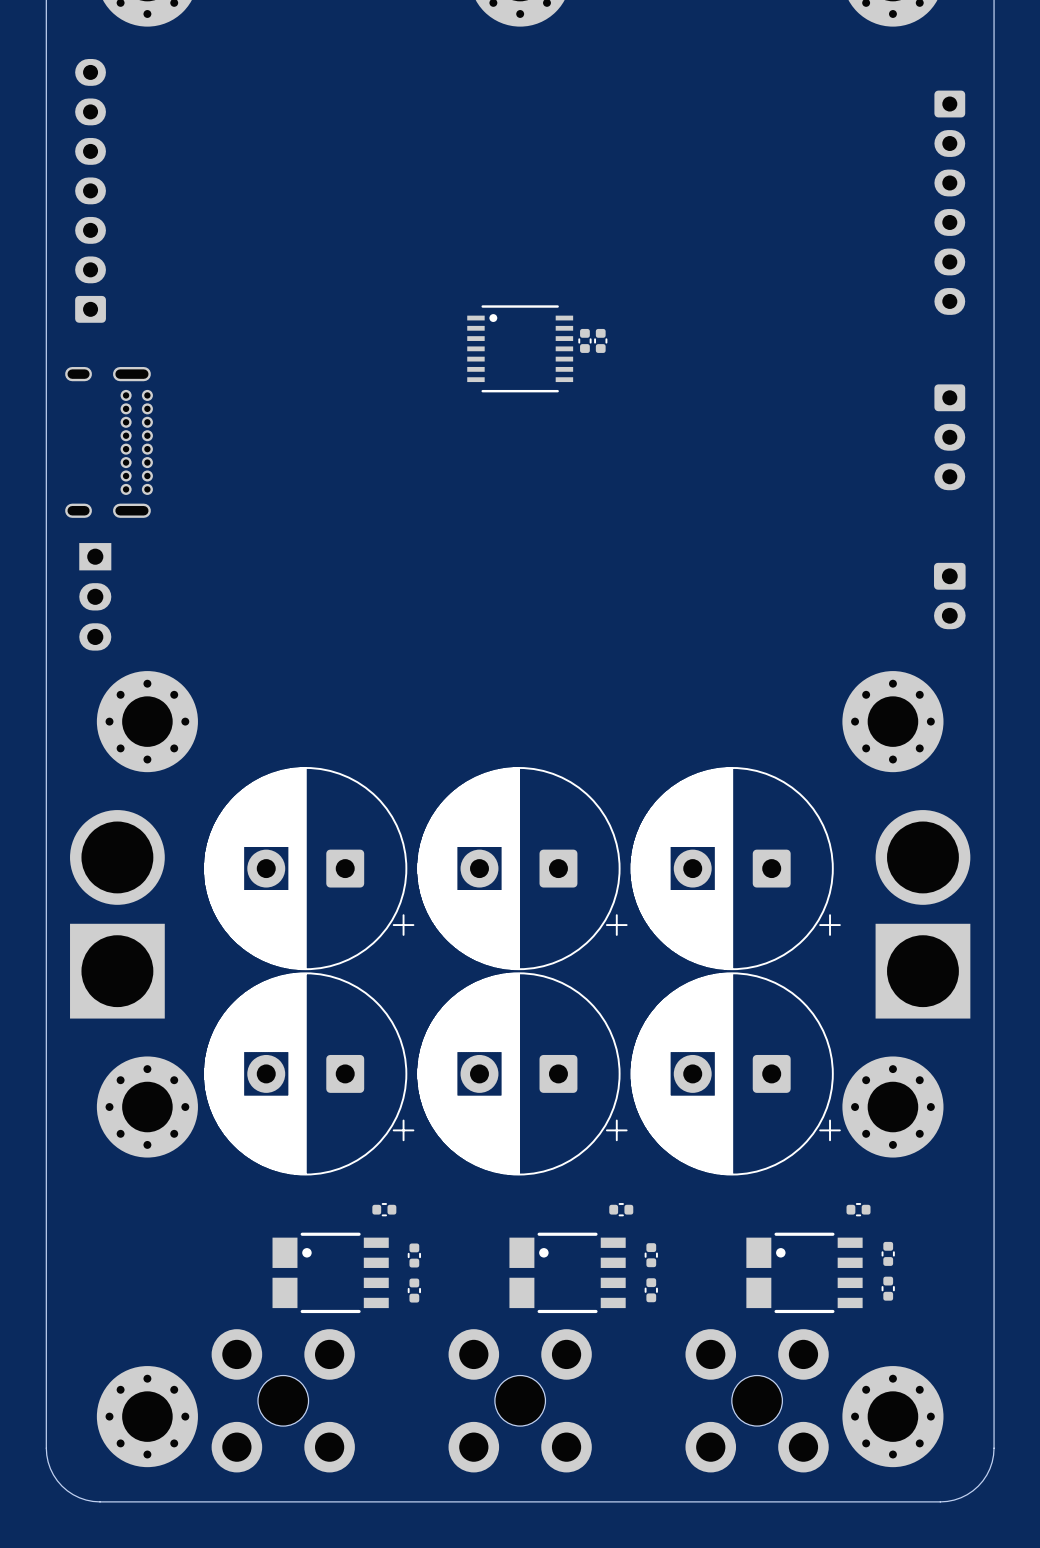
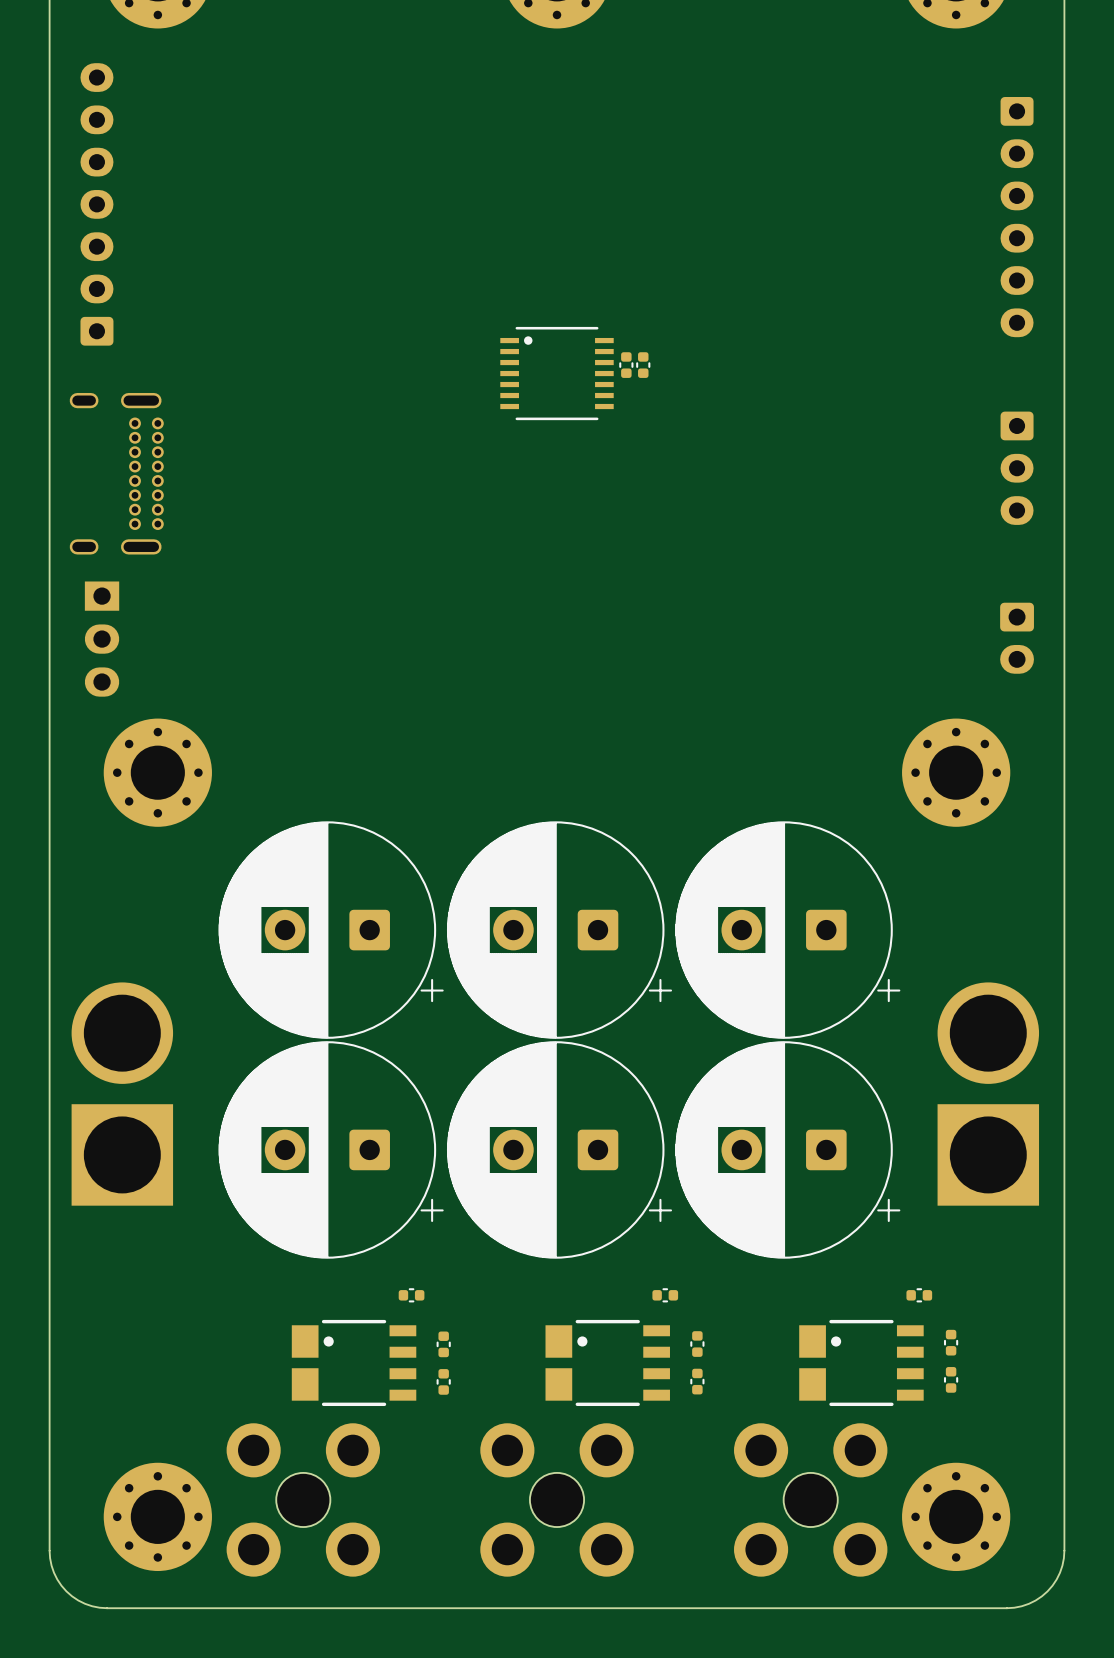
part position: (117, 914) -> (122, 1094)
part position: (922, 914) -> (988, 1094)
part: (147, 1107) -> none
part: (892, 1107) -> none

